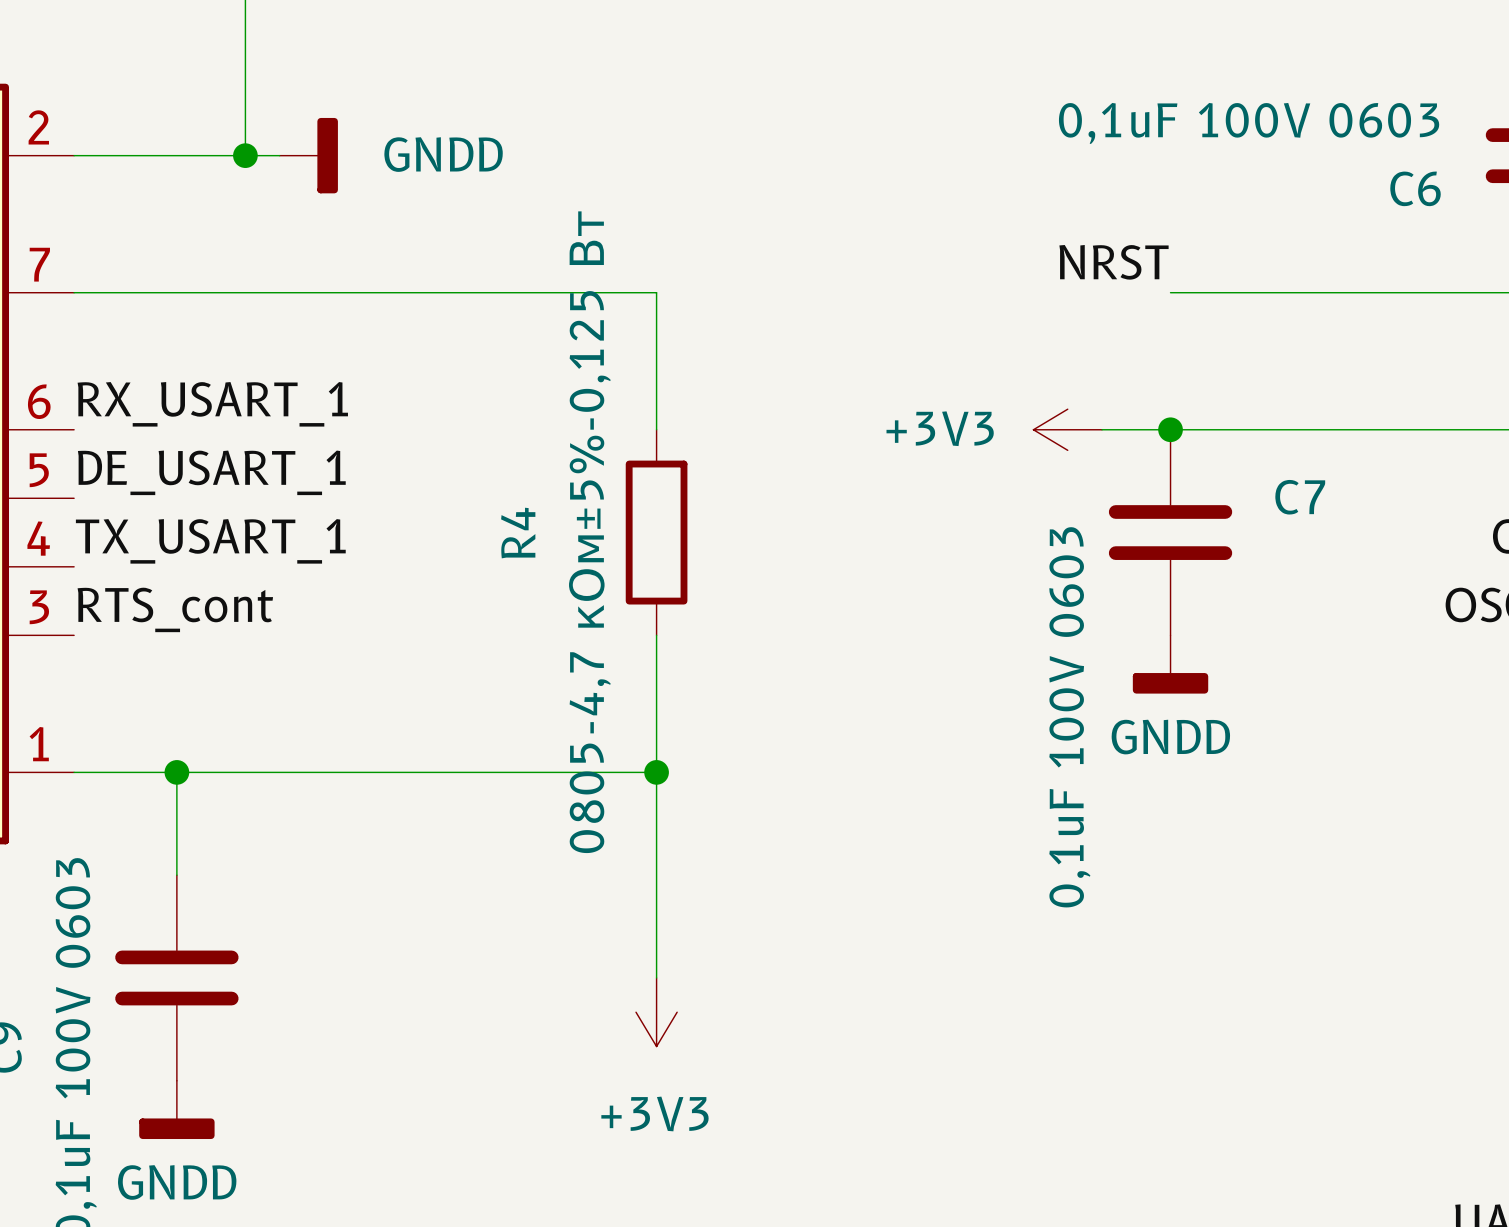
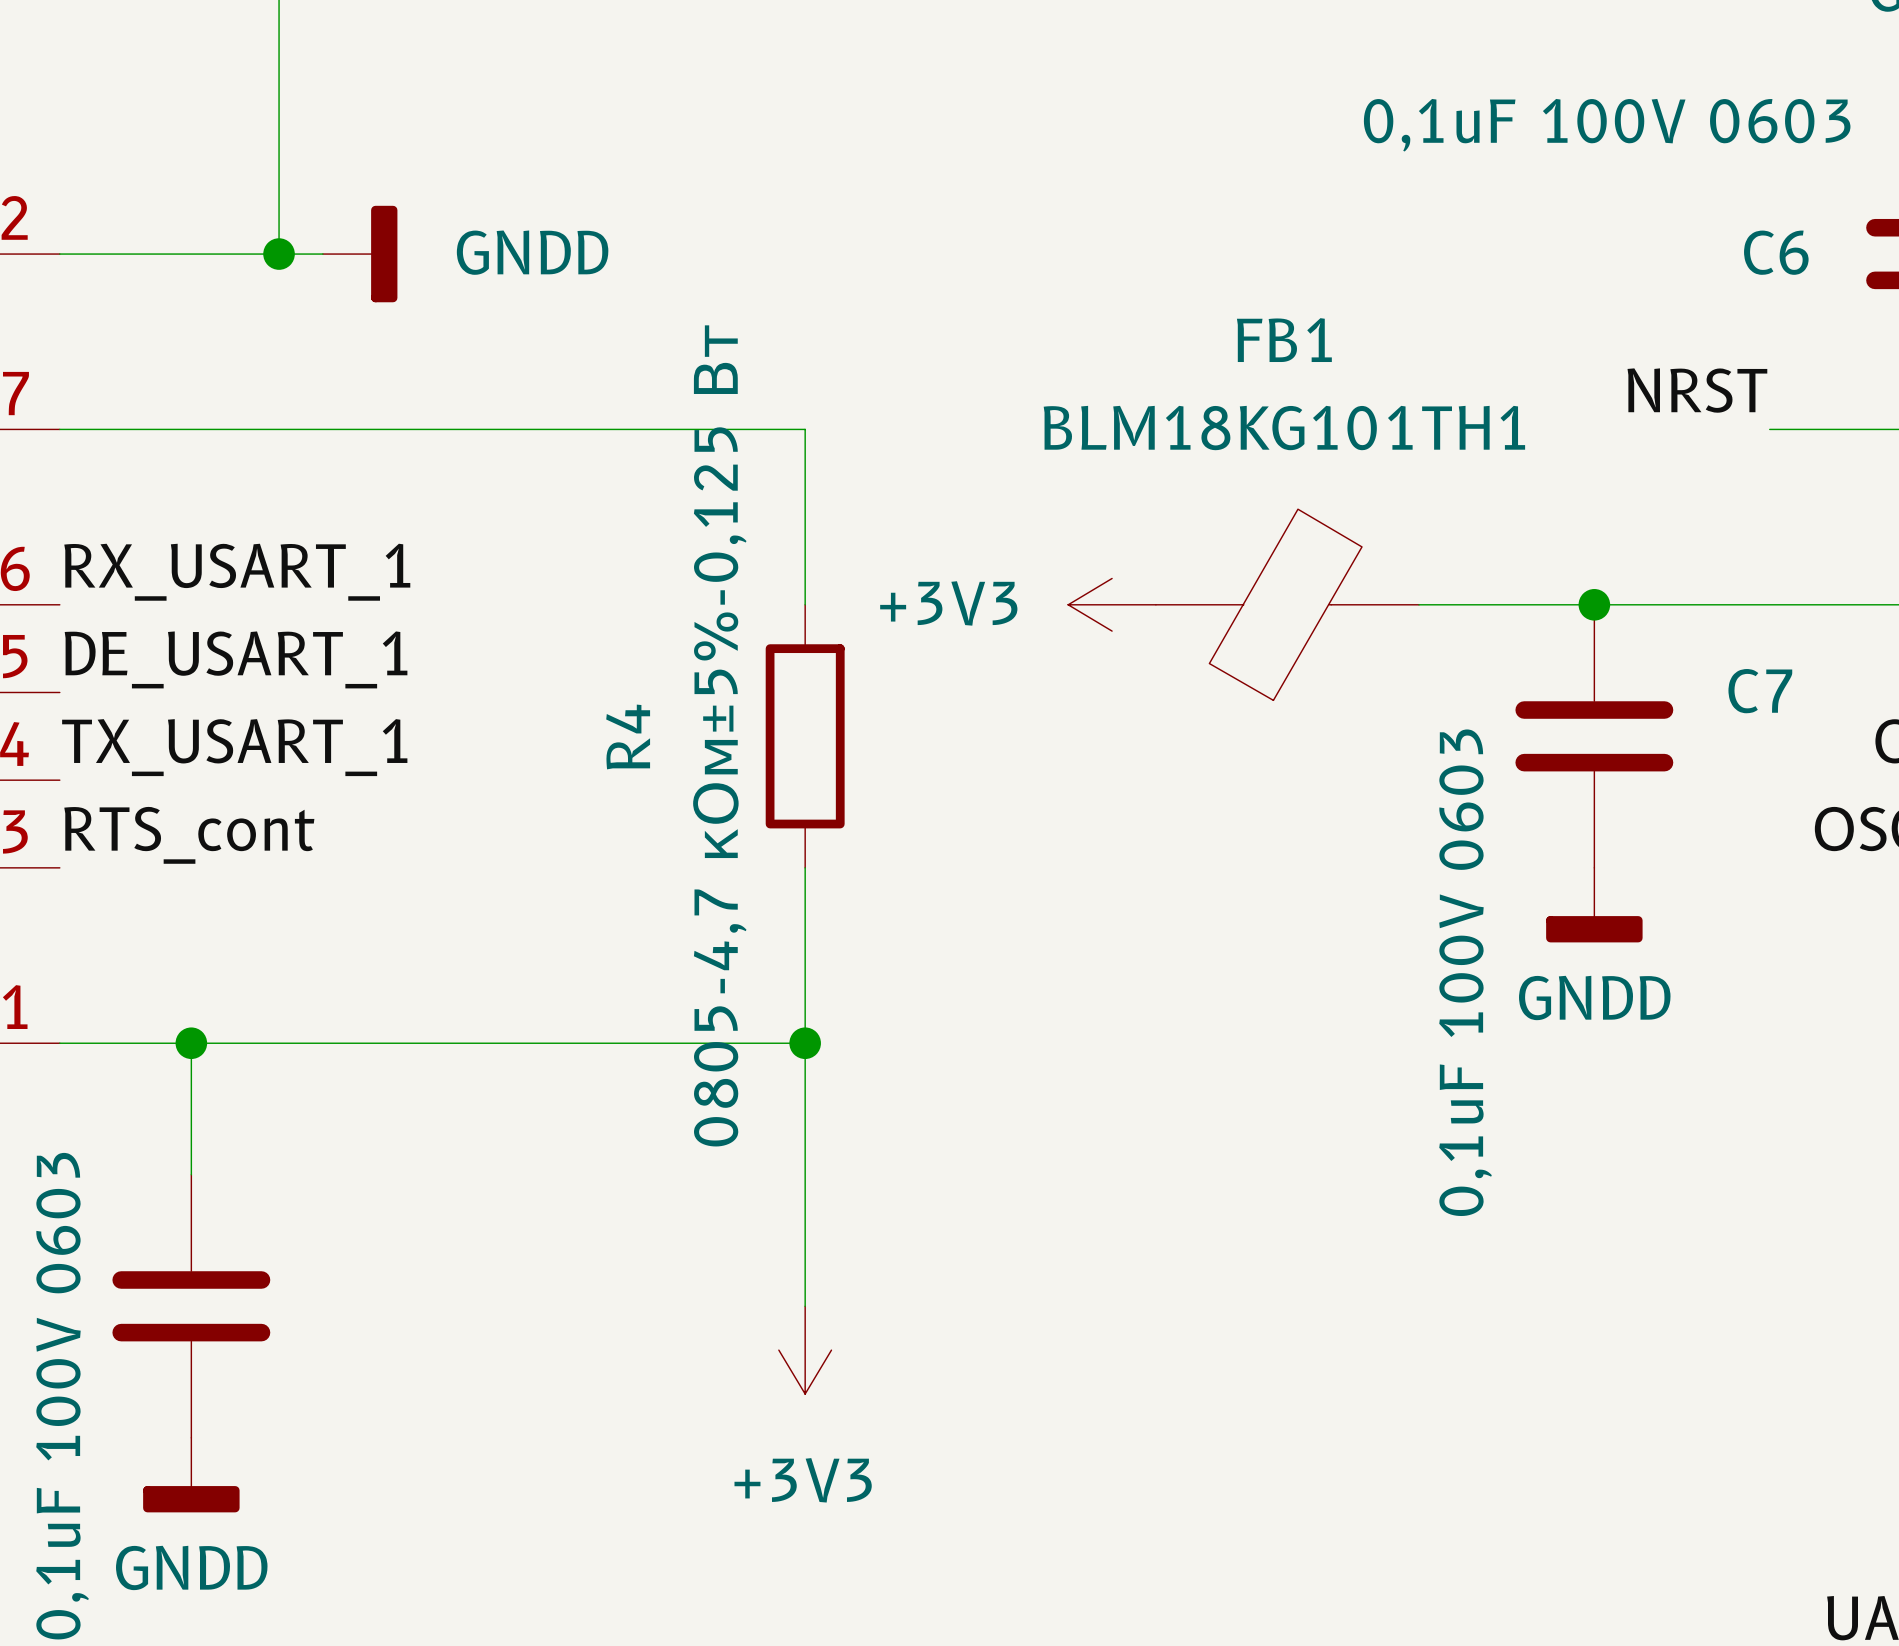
C6 value position: 0,1uF 100V 0603 (1249, 123) -> 0,1uF 100V 0603 (1607, 125)
C6 name position: C6 (1415, 188) -> C6 (1776, 252)
label position: NRST (1114, 262) -> NRST (1697, 390)
wire: (1170, 292) (1410, 292) -> none
FB1: none -> BLM18KG101TH1 (1287, 604)
power symbol position: +3V3 (1067, 429) -> +3V3 (1112, 604)
junction position: (1170, 429) -> (1594, 604)
C7 position: (1170, 532) -> (1594, 736)
power symbol position: GNDD (1170, 664) -> GNDD (1594, 905)

